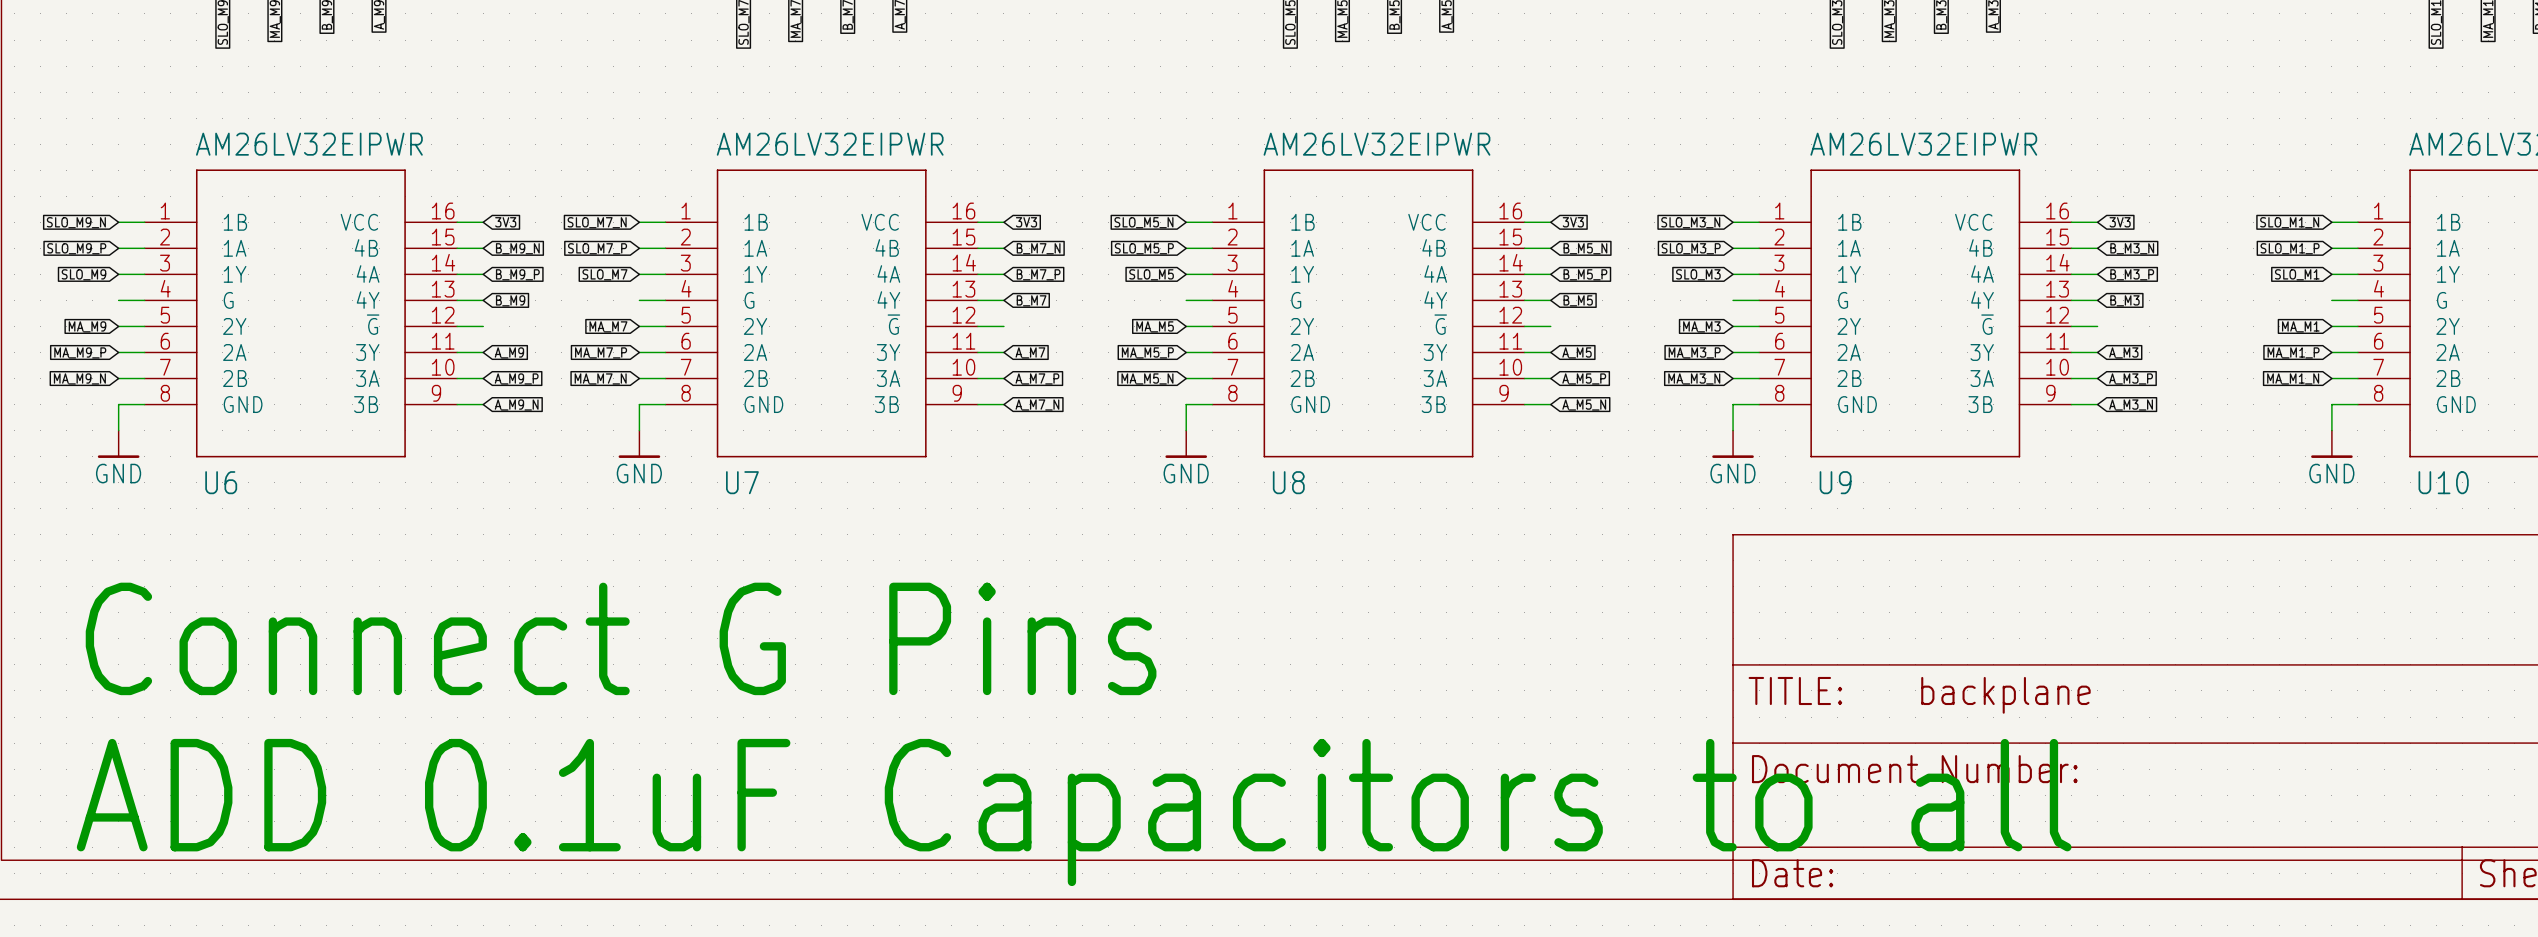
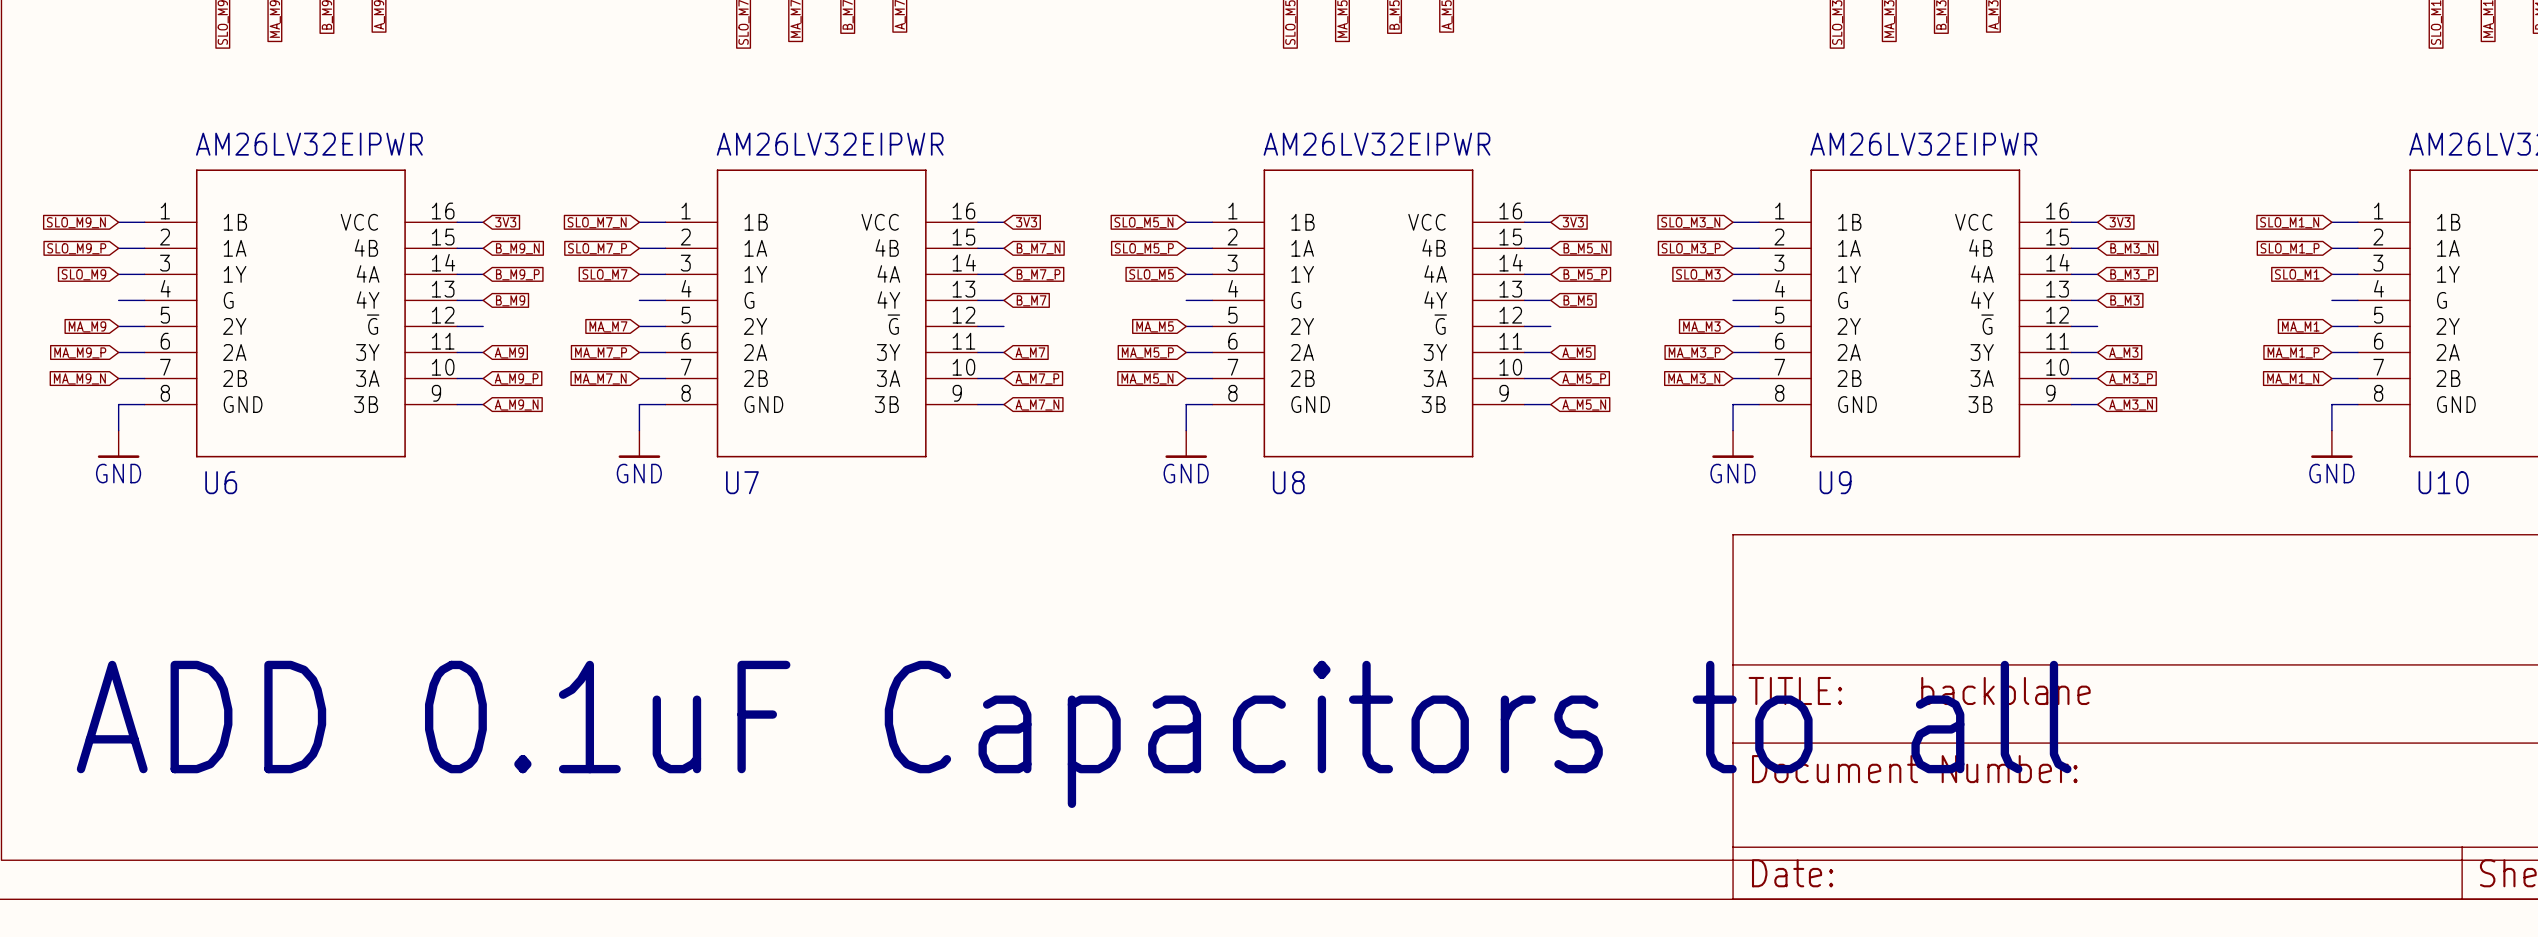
text: Connect G Pins (621, 638) -> none
text position: ADD 0.1uF Capacitors to all (1074, 812) -> ADD 0.1uF Capacitors to all (1074, 734)

